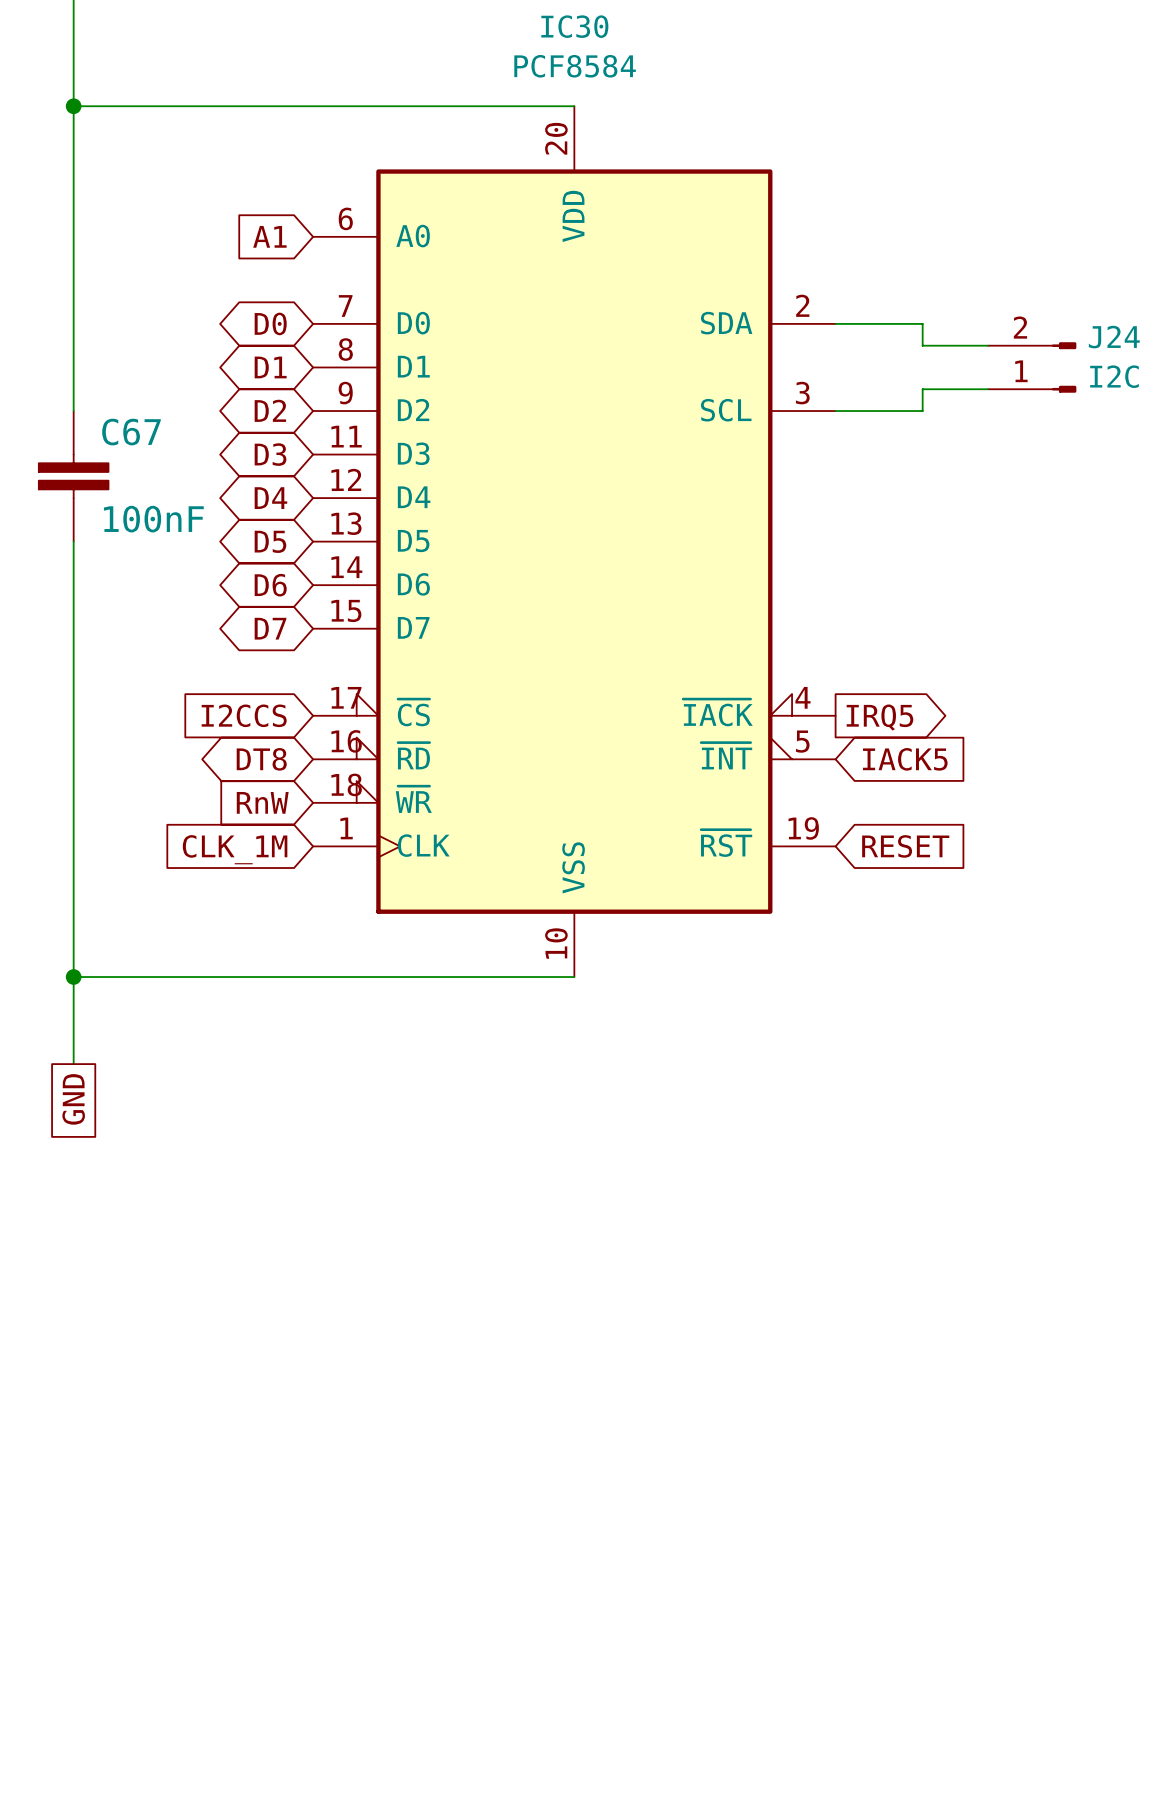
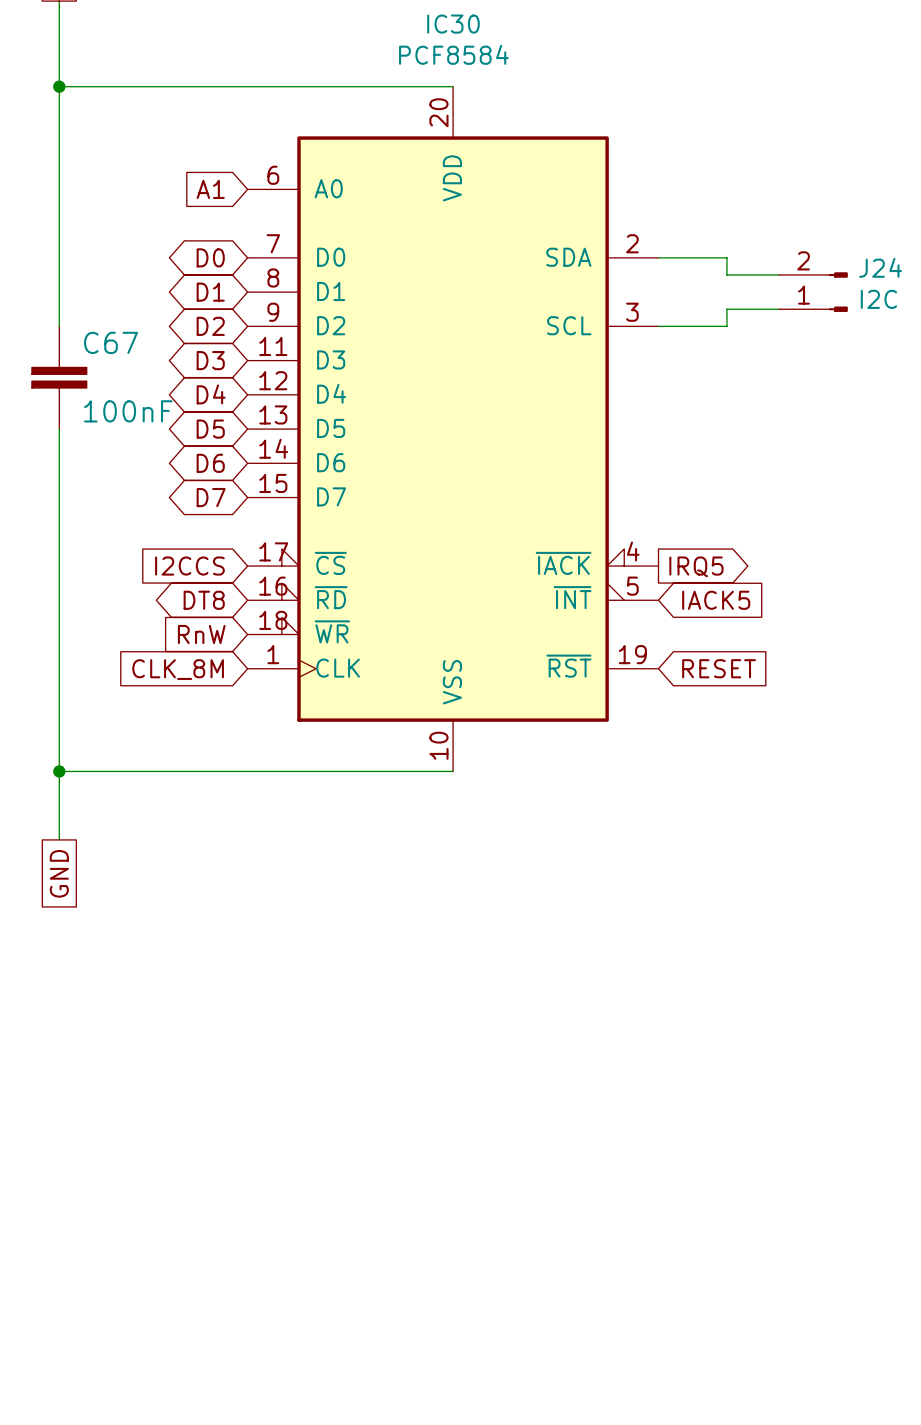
global label: CLK_1M (235, 849) -> CLK_8M (178, 669)

